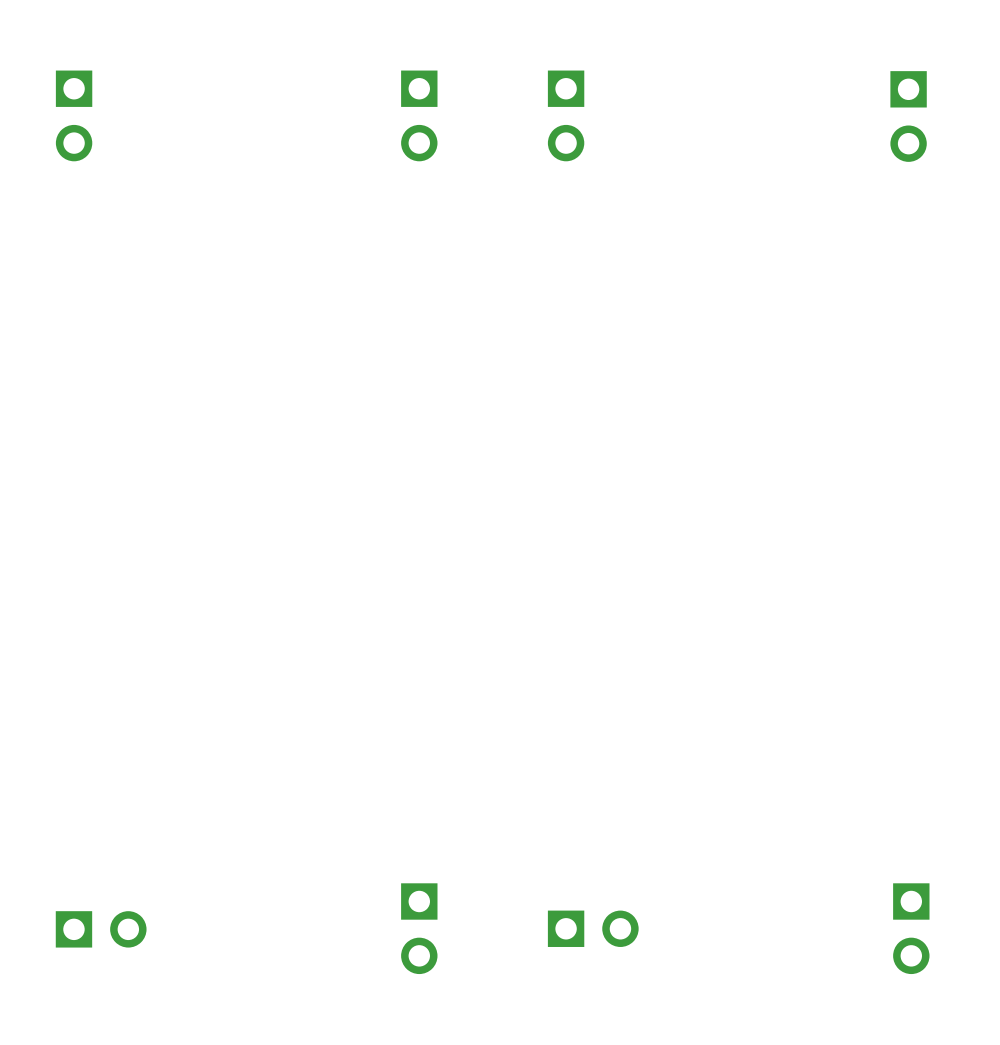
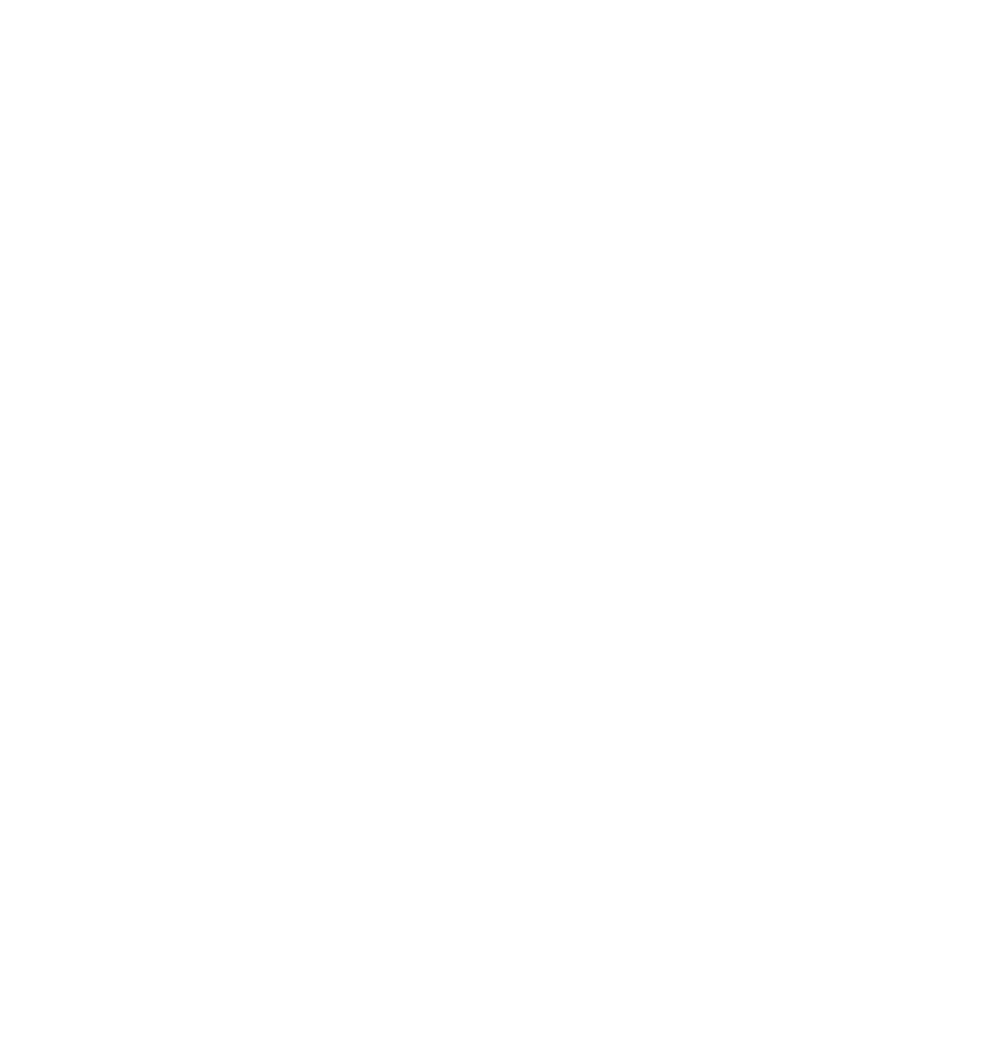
part: (74, 115) -> none
part: (419, 115) -> none
part: (566, 115) -> none
part: (908, 116) -> none
part: (419, 928) -> none
part: (593, 928) -> none
part: (911, 928) -> none
part: (101, 929) -> none

